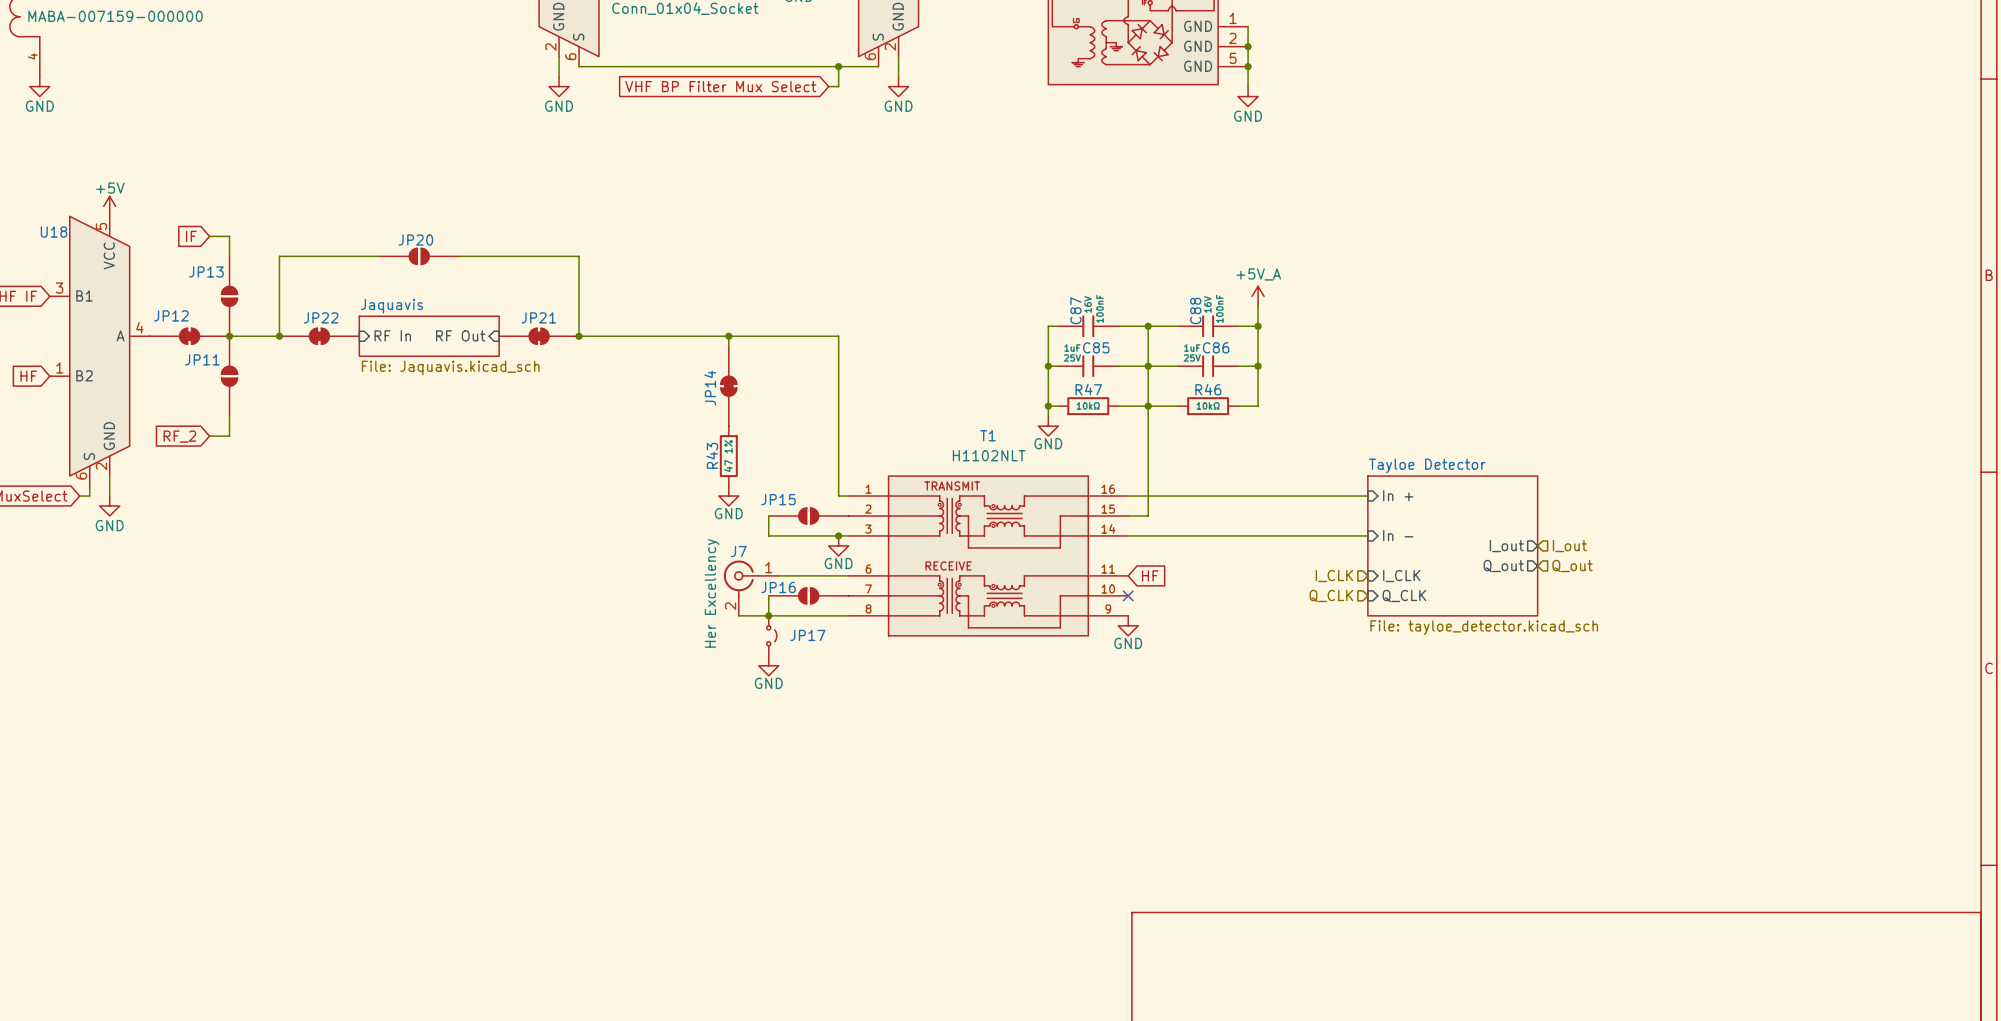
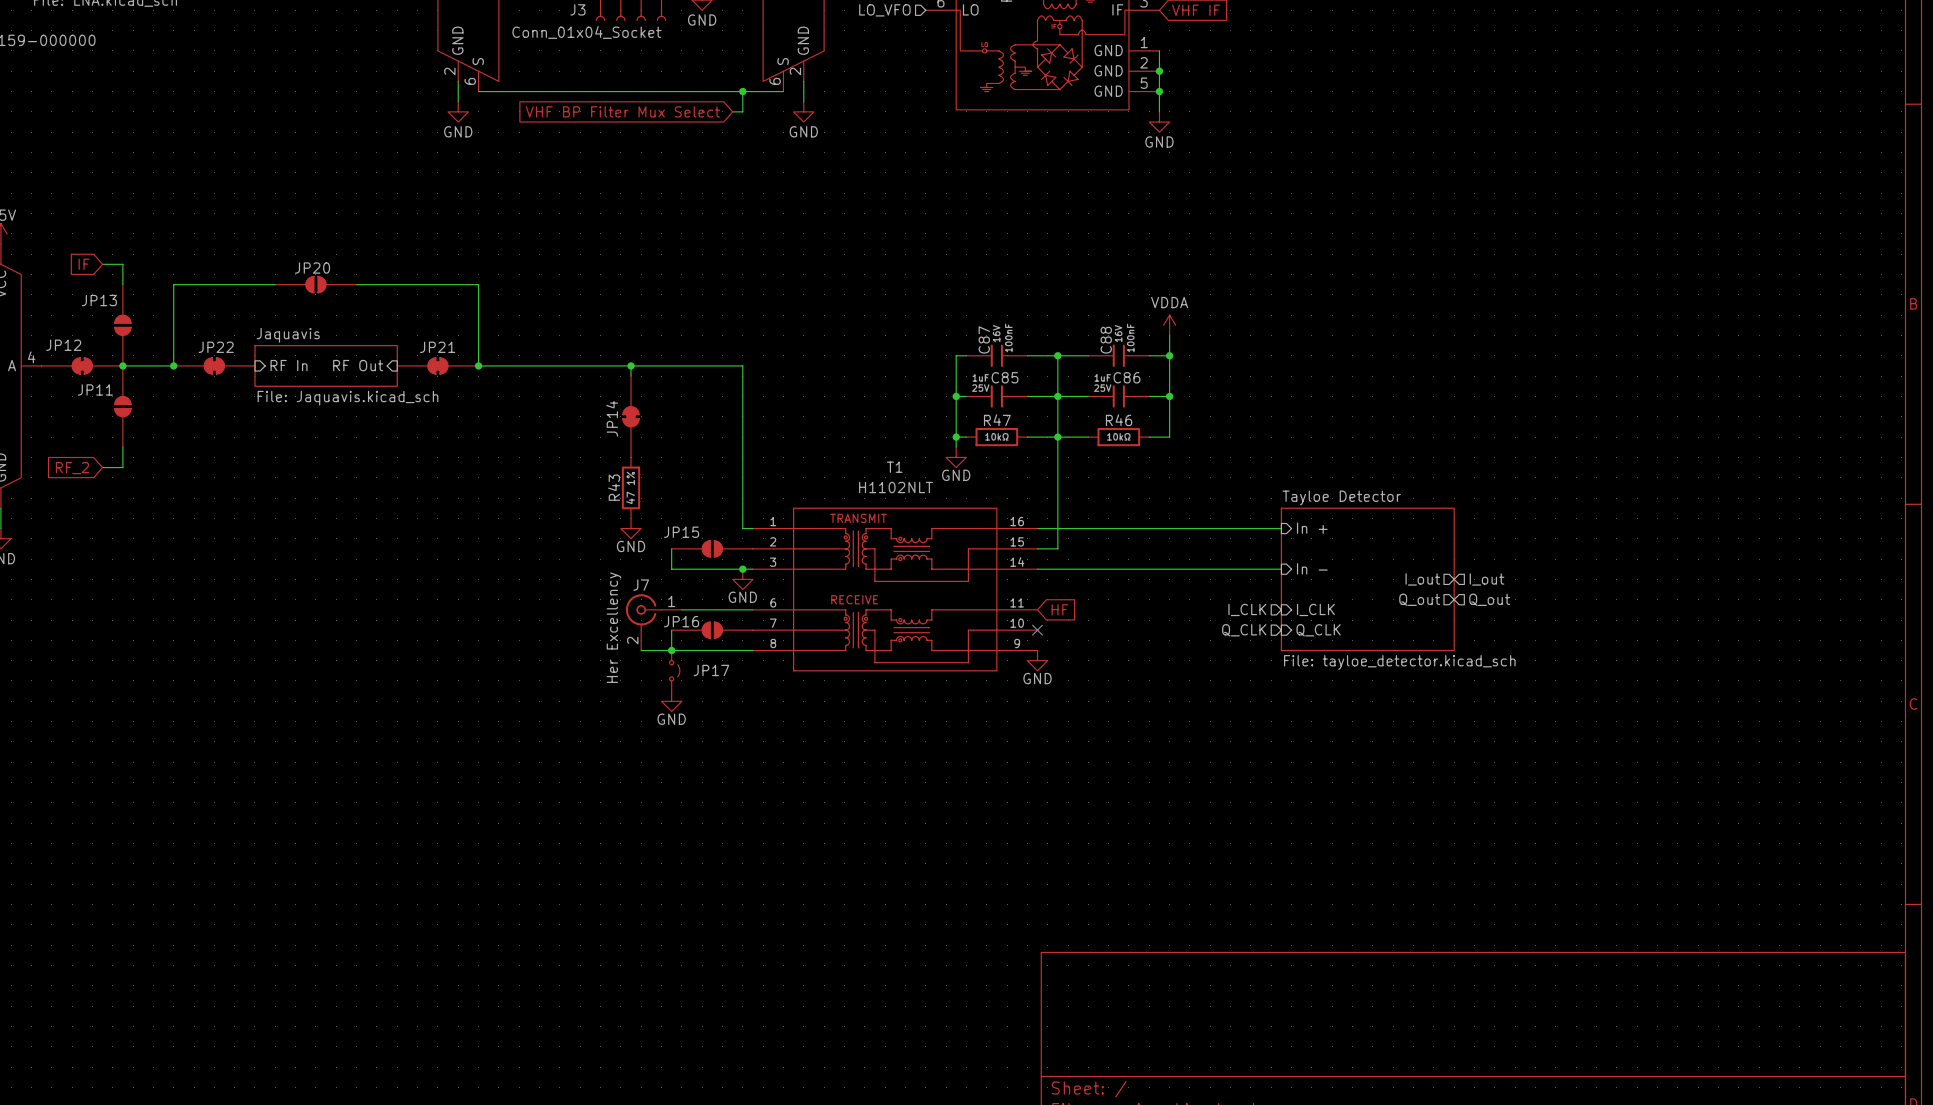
power symbol: +5V_A (1258, 296) -> VDDA (1169, 325)

